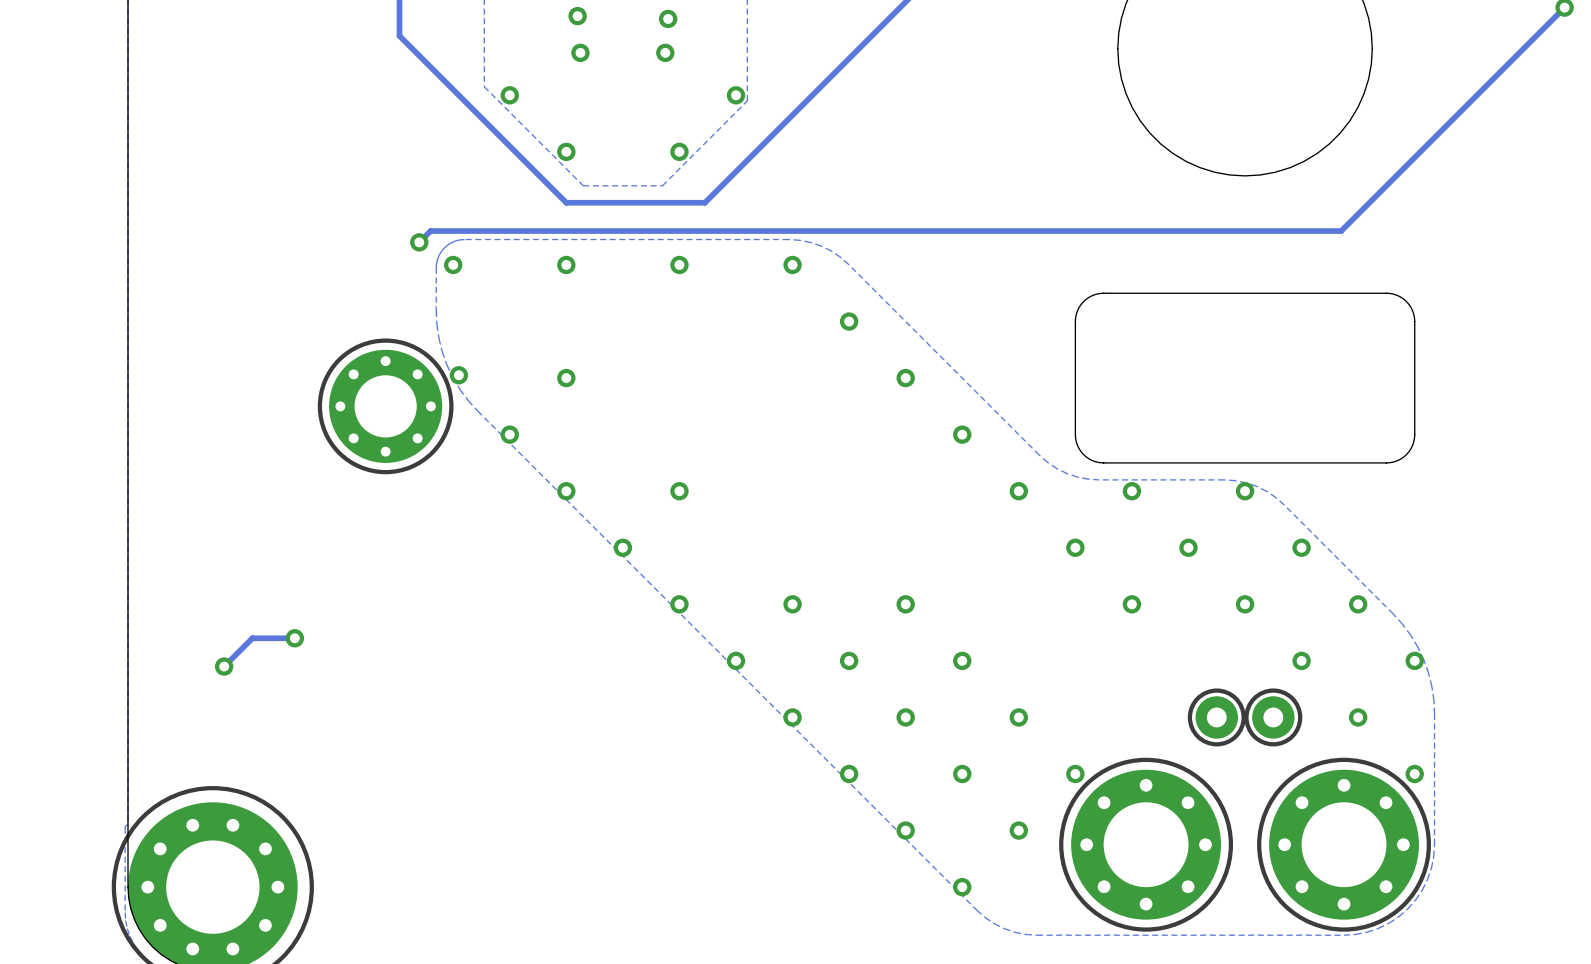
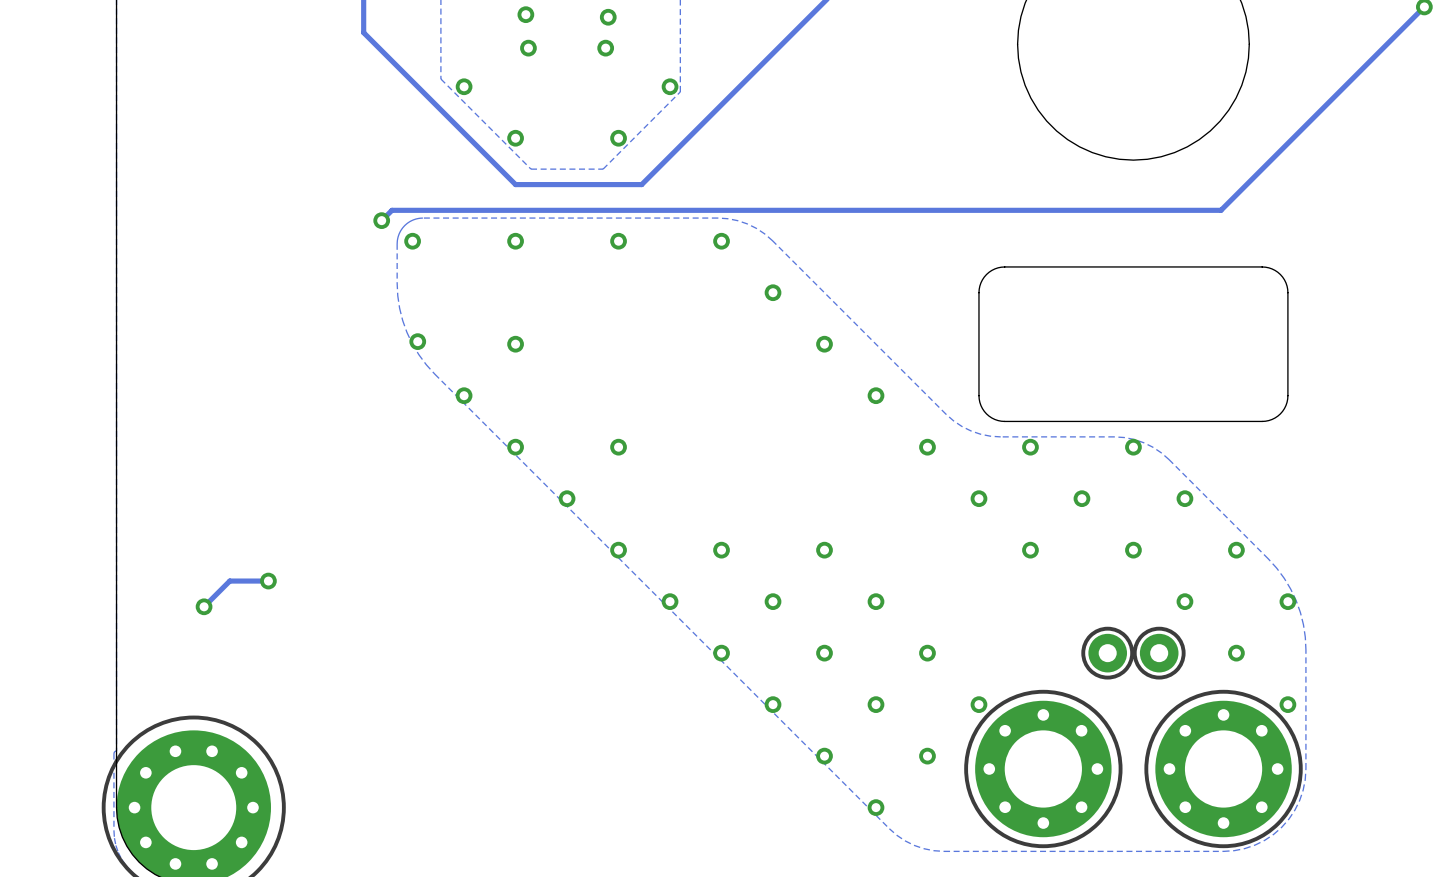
part: (385, 406) -> none

